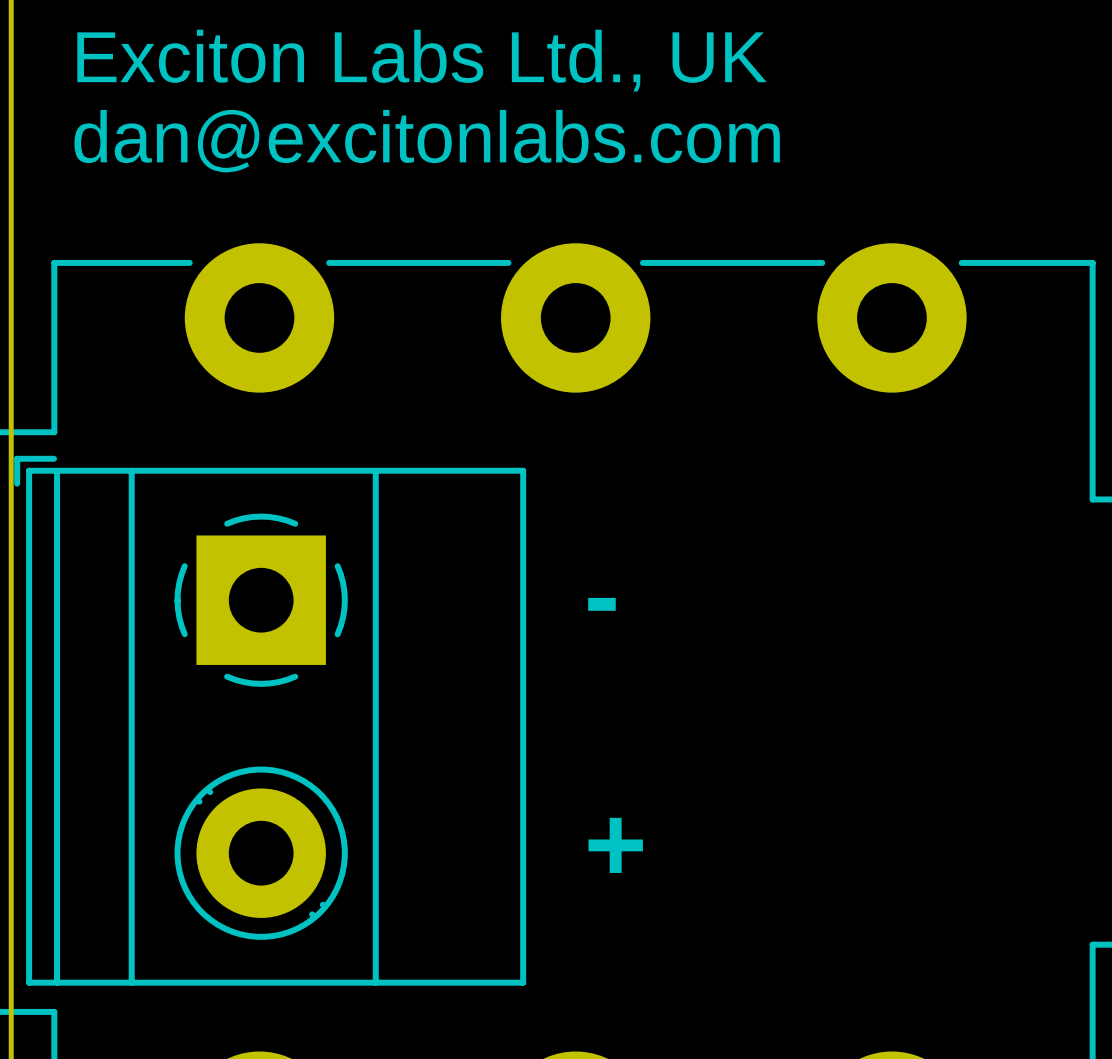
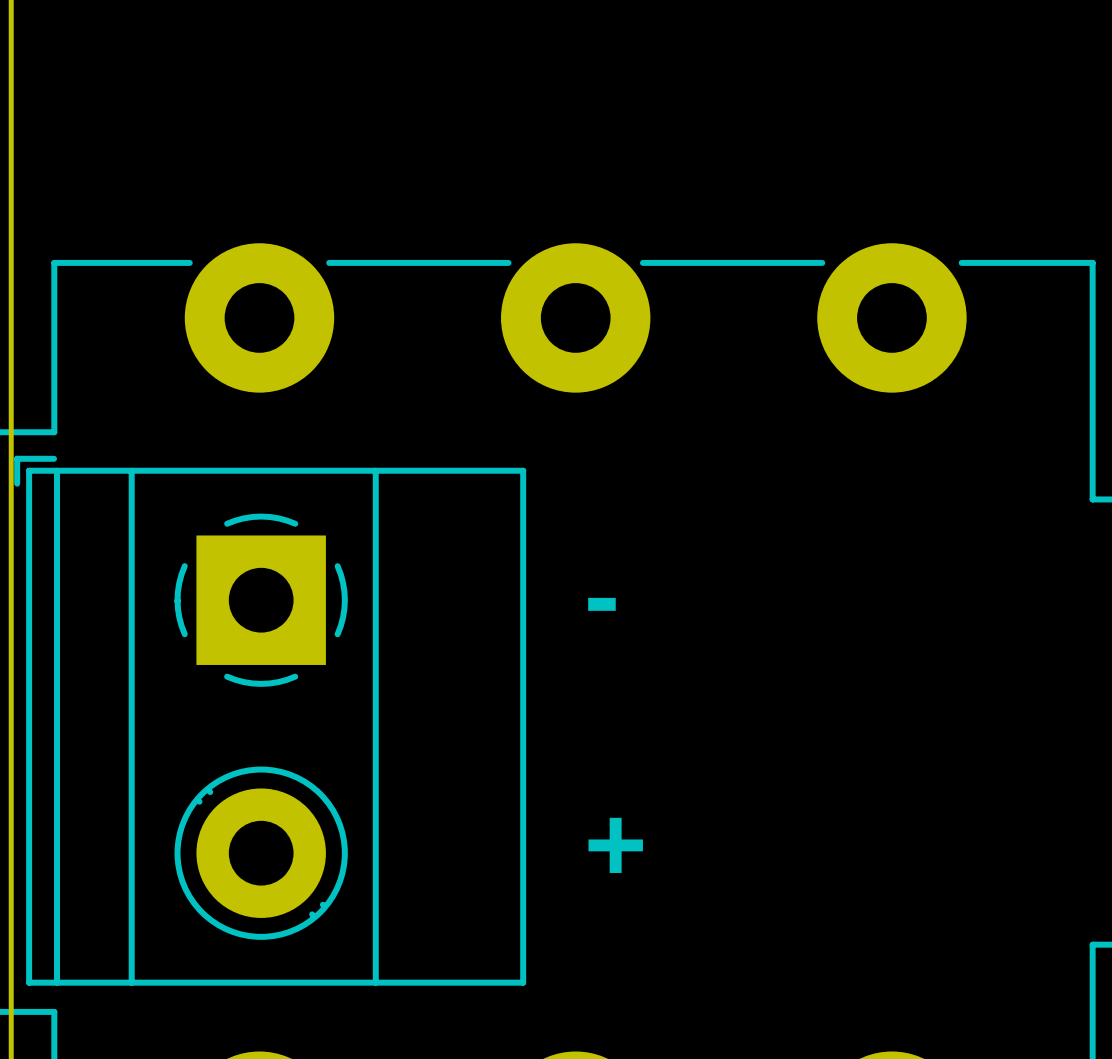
text: Exciton Labs Ltd., UK (422, 60) -> none
text: dan@excitonlabs.com (427, 141) -> none

